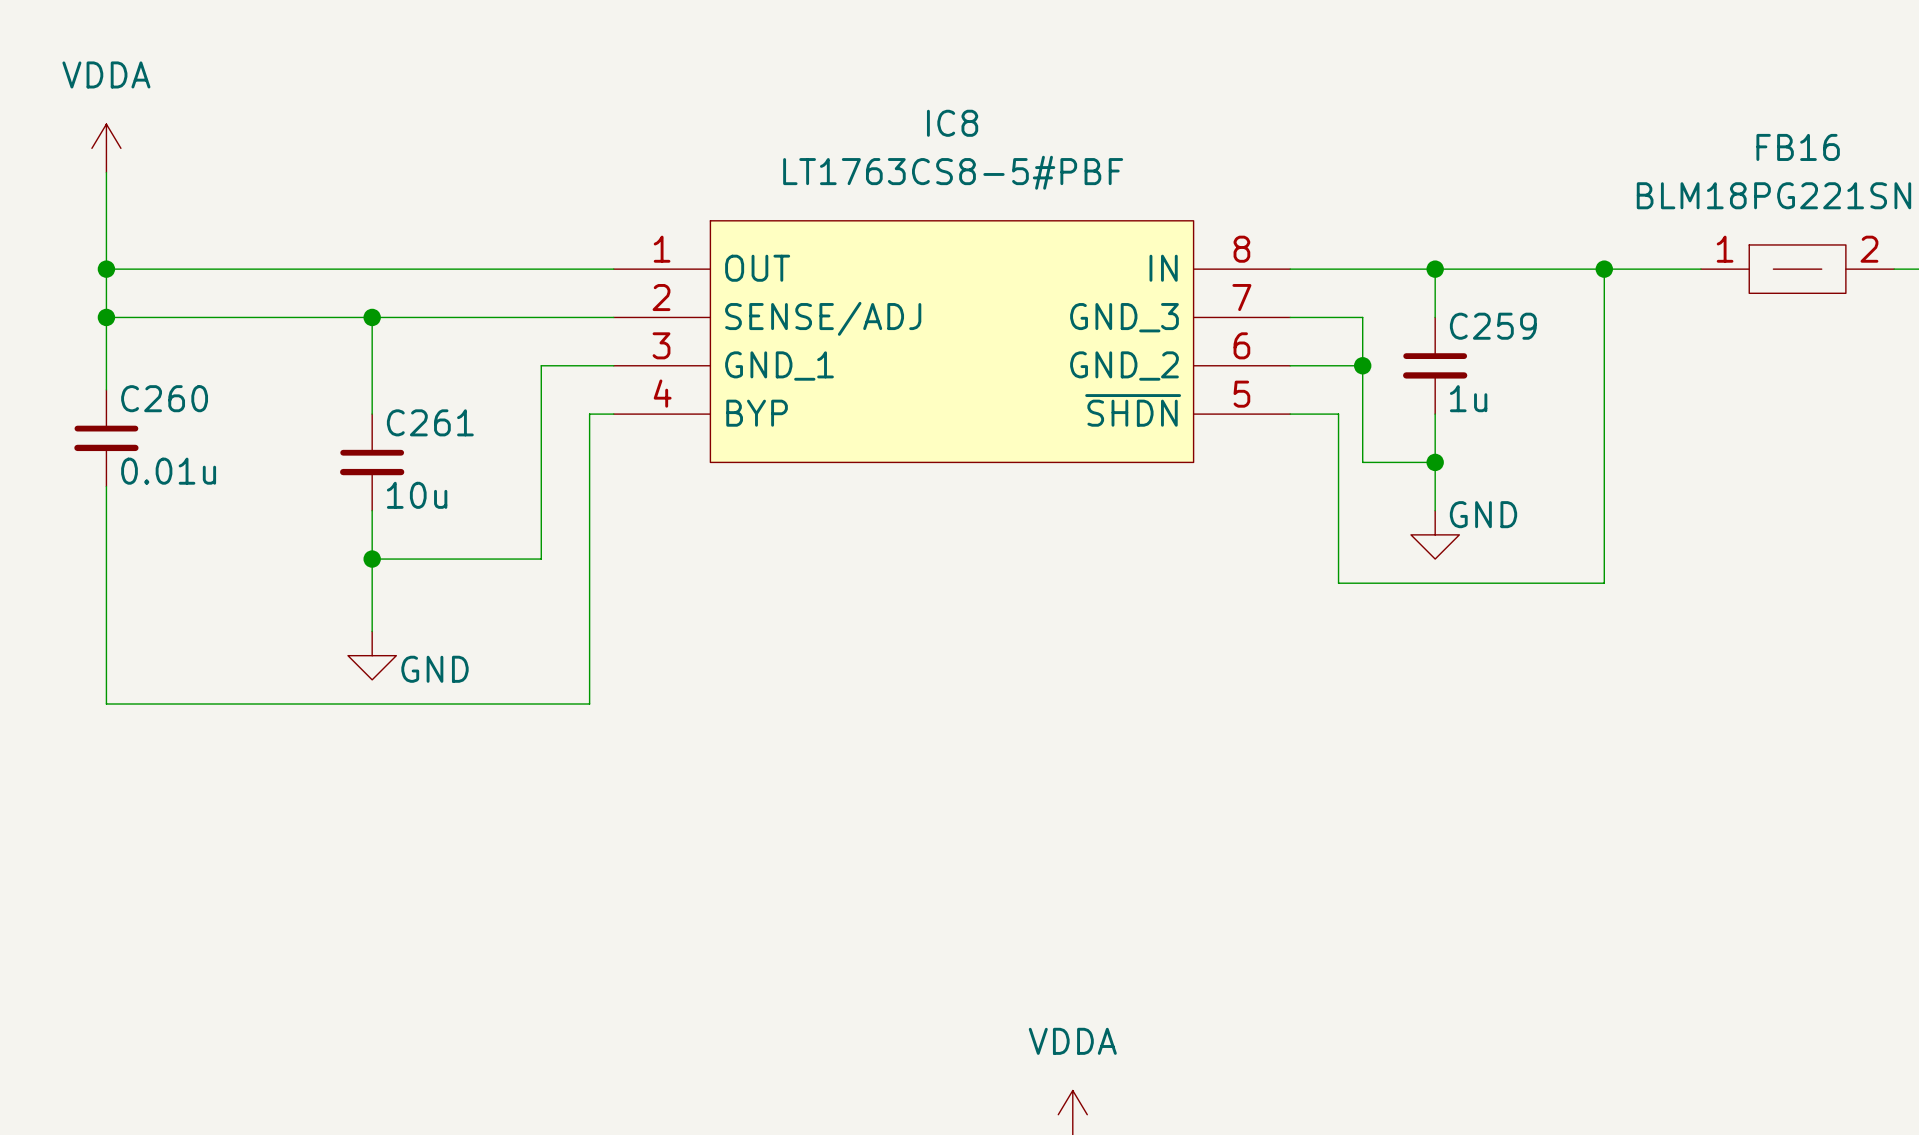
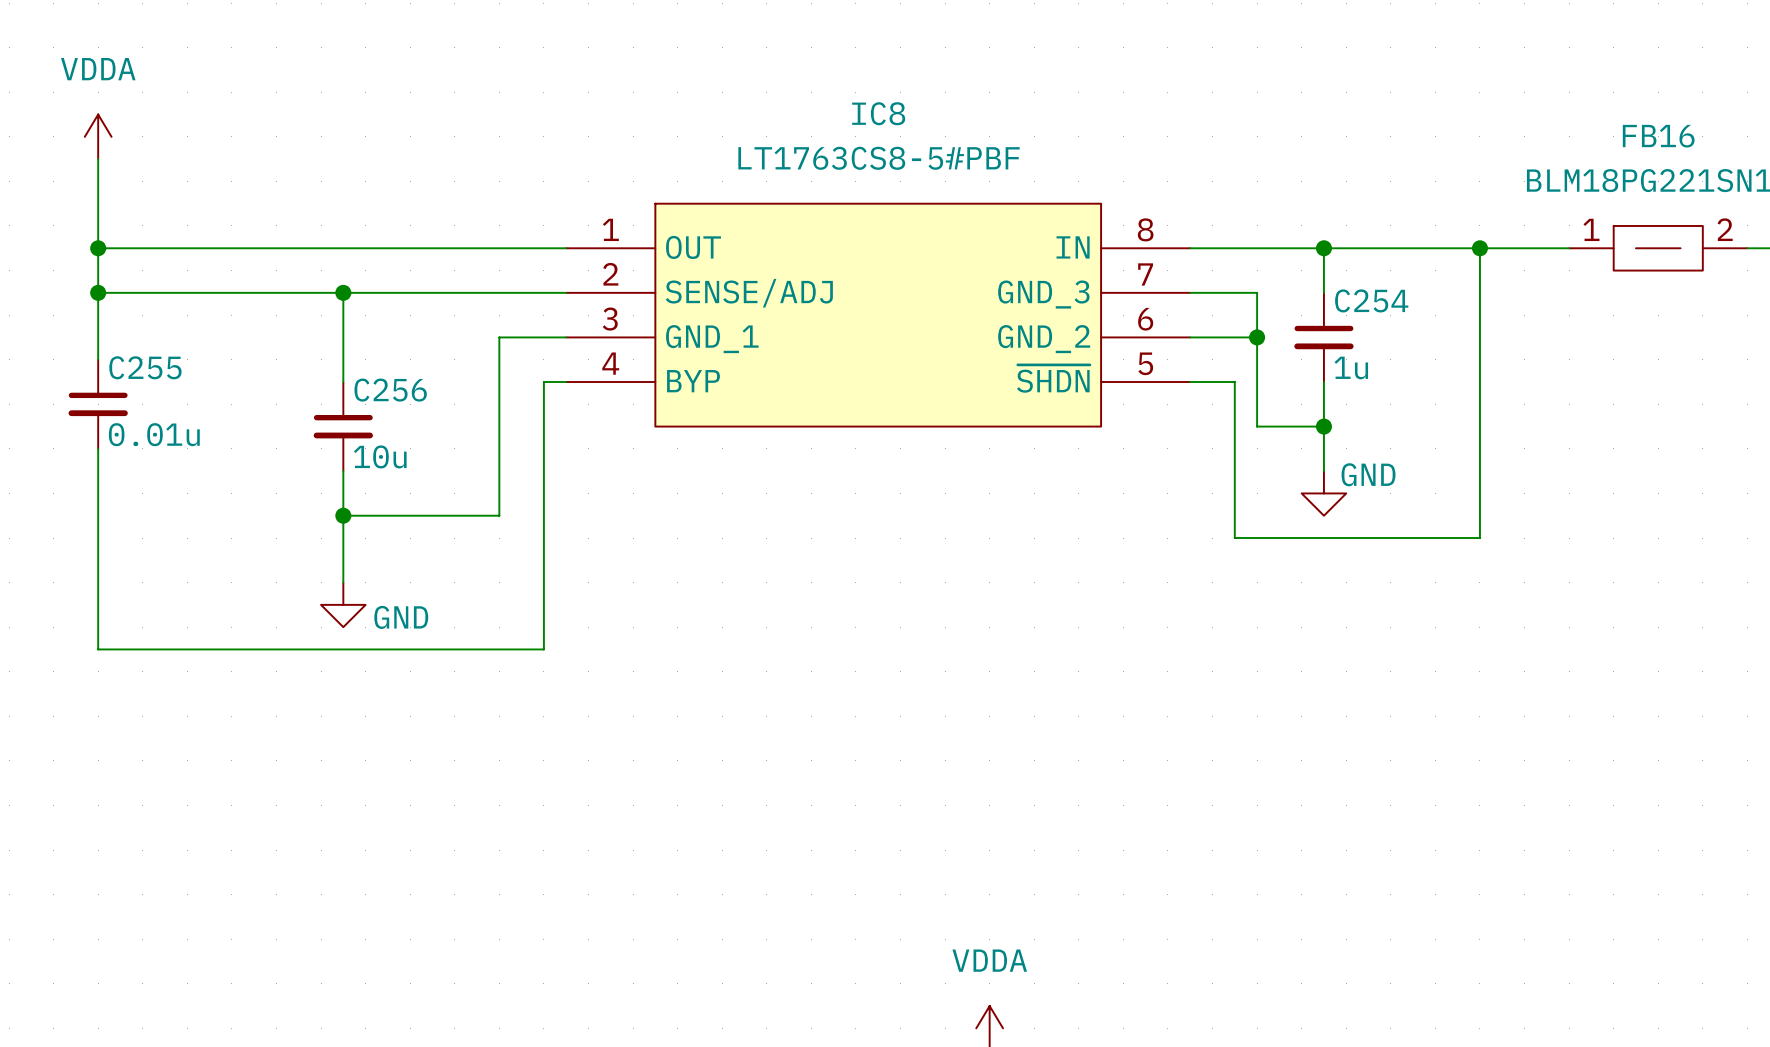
C259 name: C259 (1493, 326) -> C254 (1371, 300)
C260 name: C260 (164, 398) -> C255 (145, 367)
C261 name: C261 (430, 422) -> C256 (390, 390)

